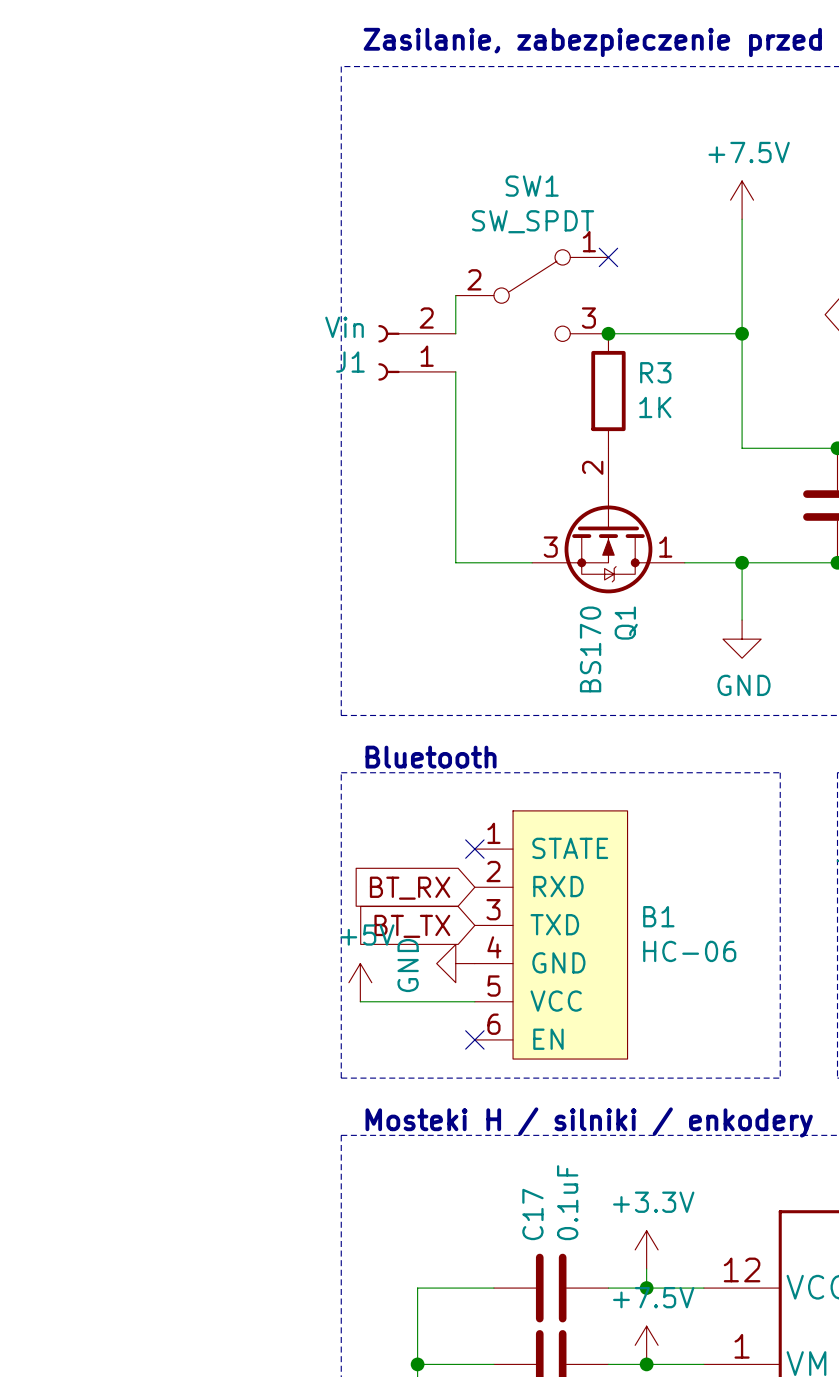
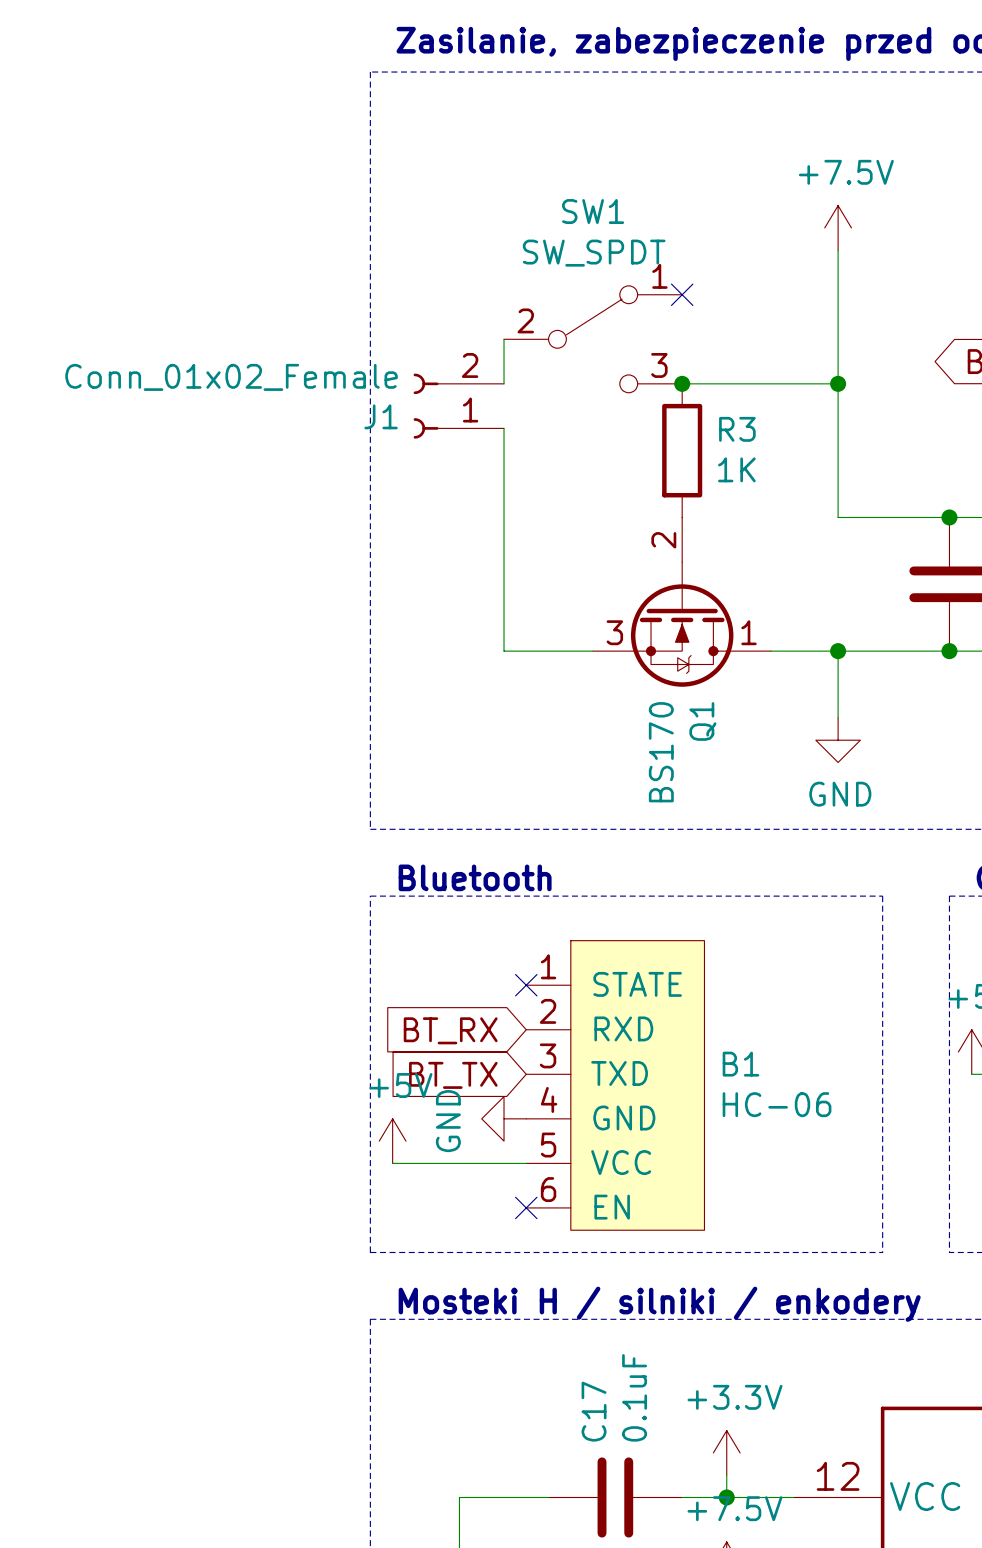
J1 value: Vin (344, 327) -> Conn_01x02_Female (231, 377)

